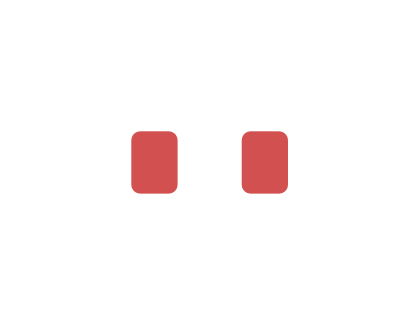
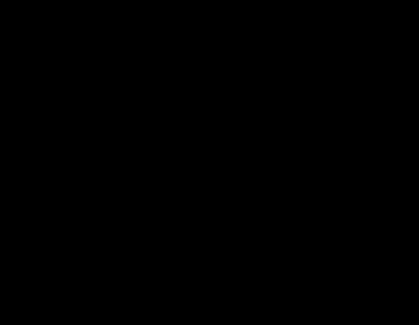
part: (209, 162) -> none

